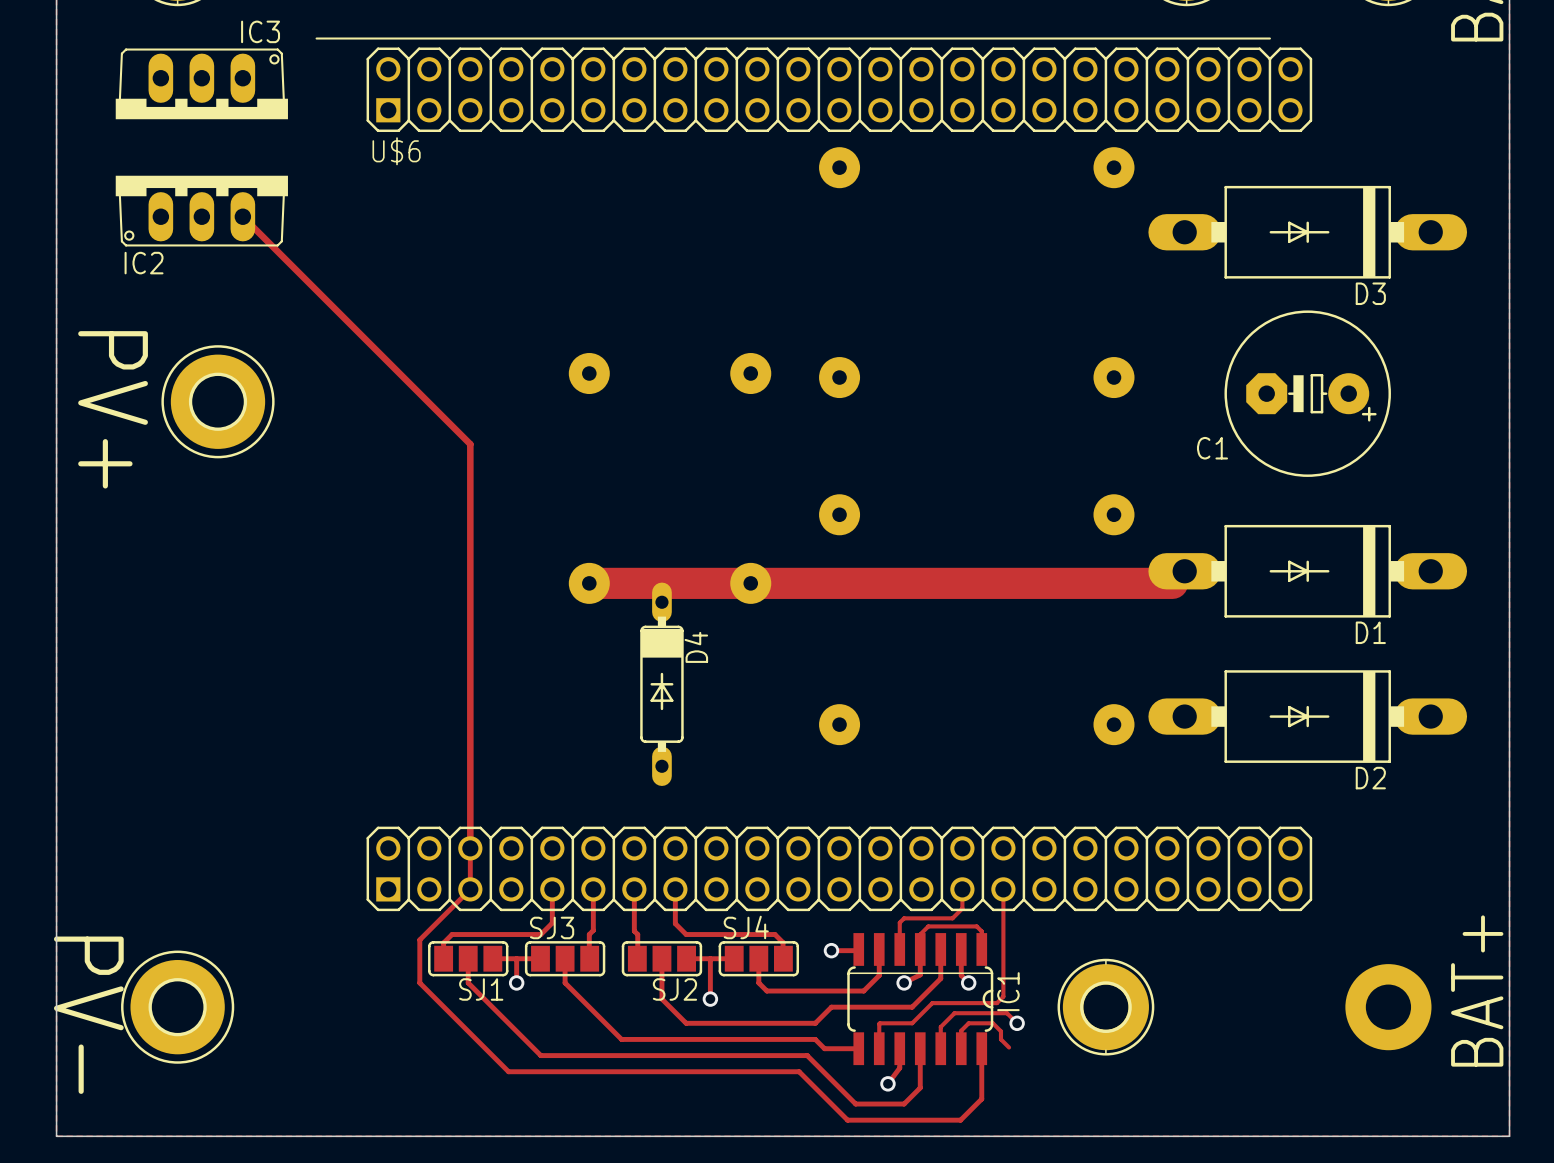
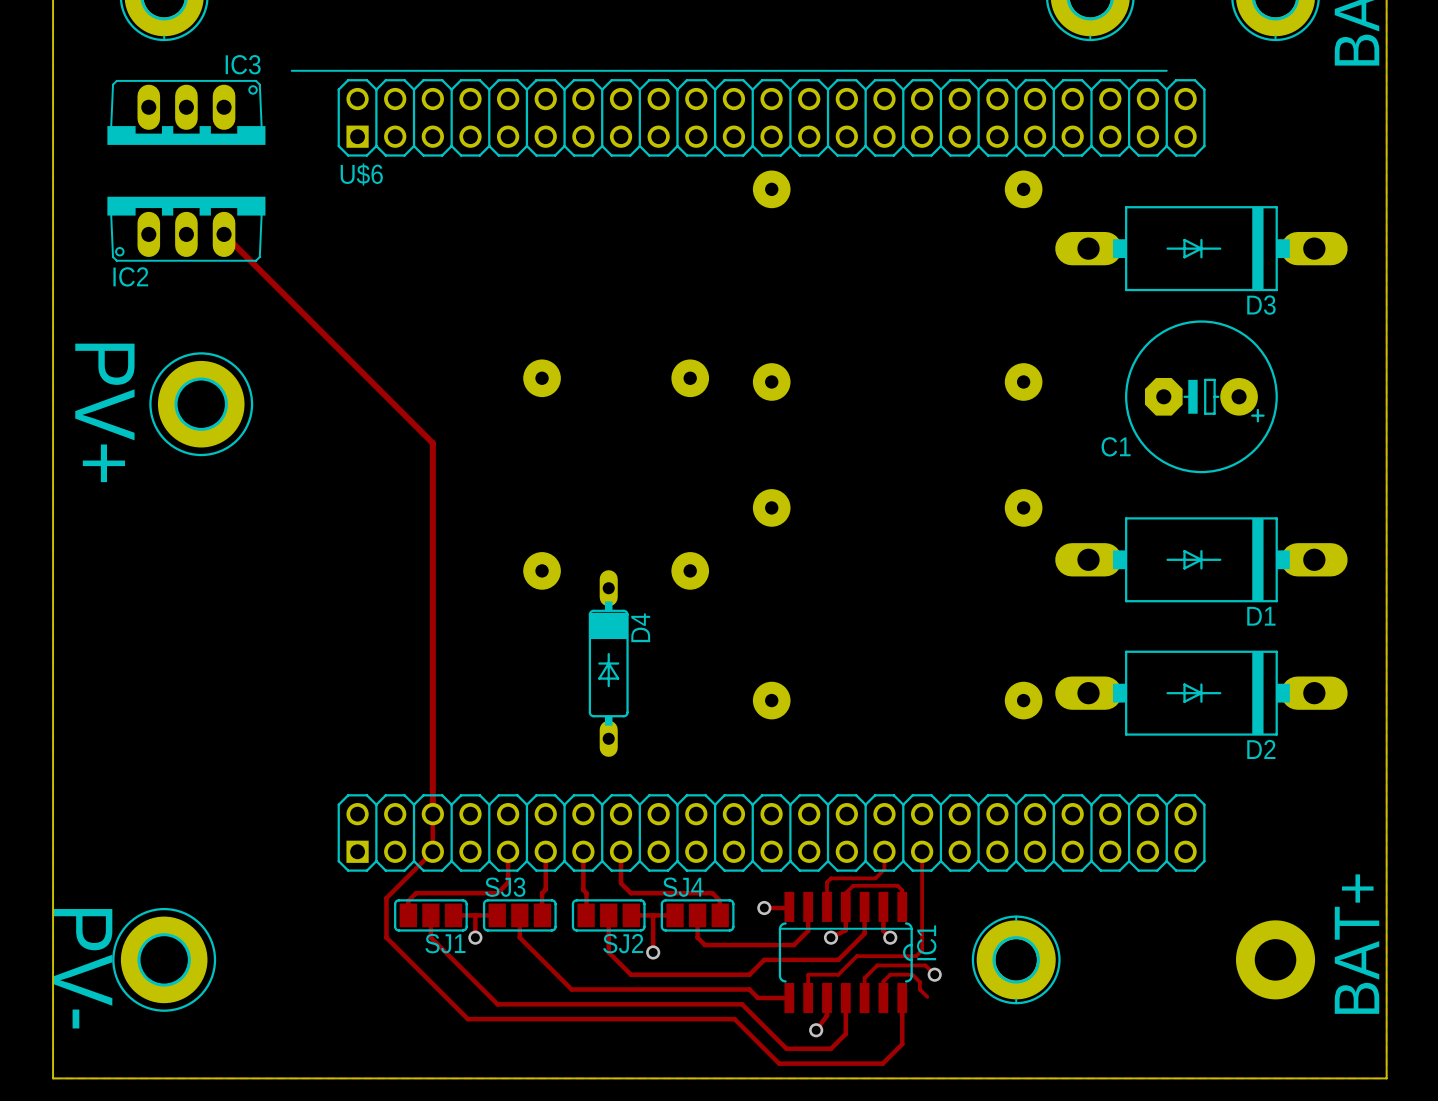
track: (589, 583) (1172, 583) -> none

